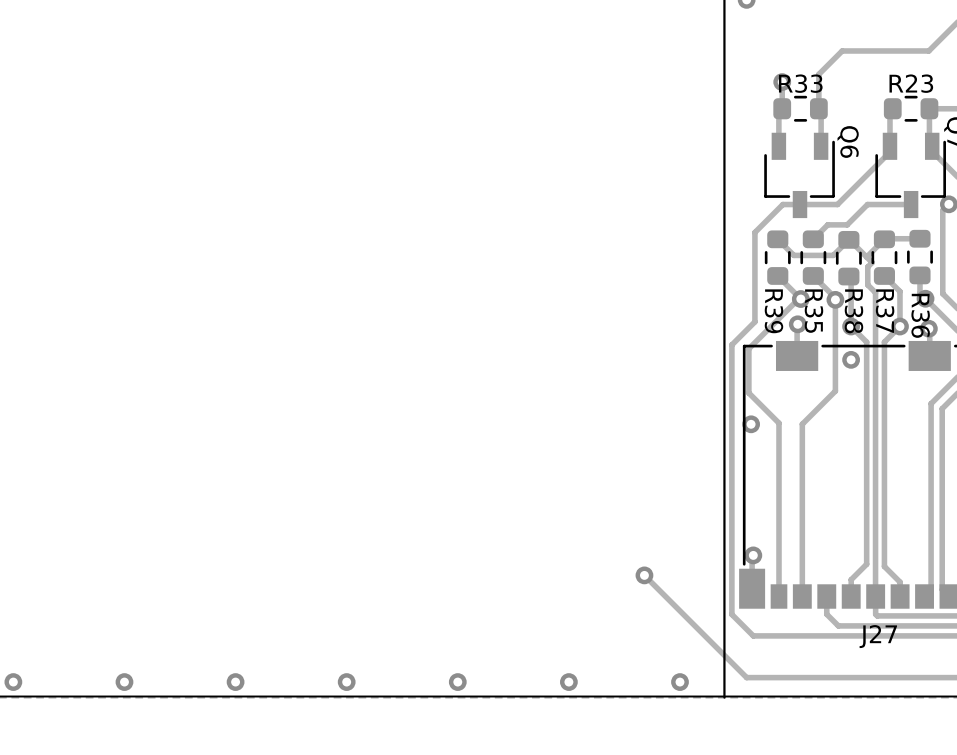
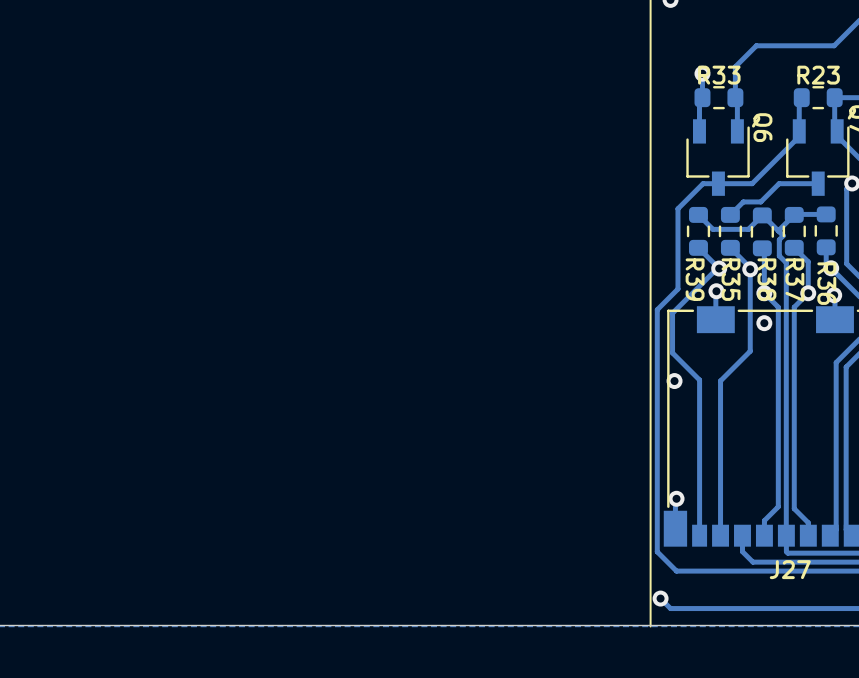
track: (644, 575) (735, 666) -> none
via: (644, 575) -> none
via: (13, 682) -> none
via: (124, 682) -> none
via: (235, 682) -> none
via: (346, 682) -> none
via: (457, 682) -> none
via: (568, 682) -> none
via position: (680, 682) -> (660, 598)

